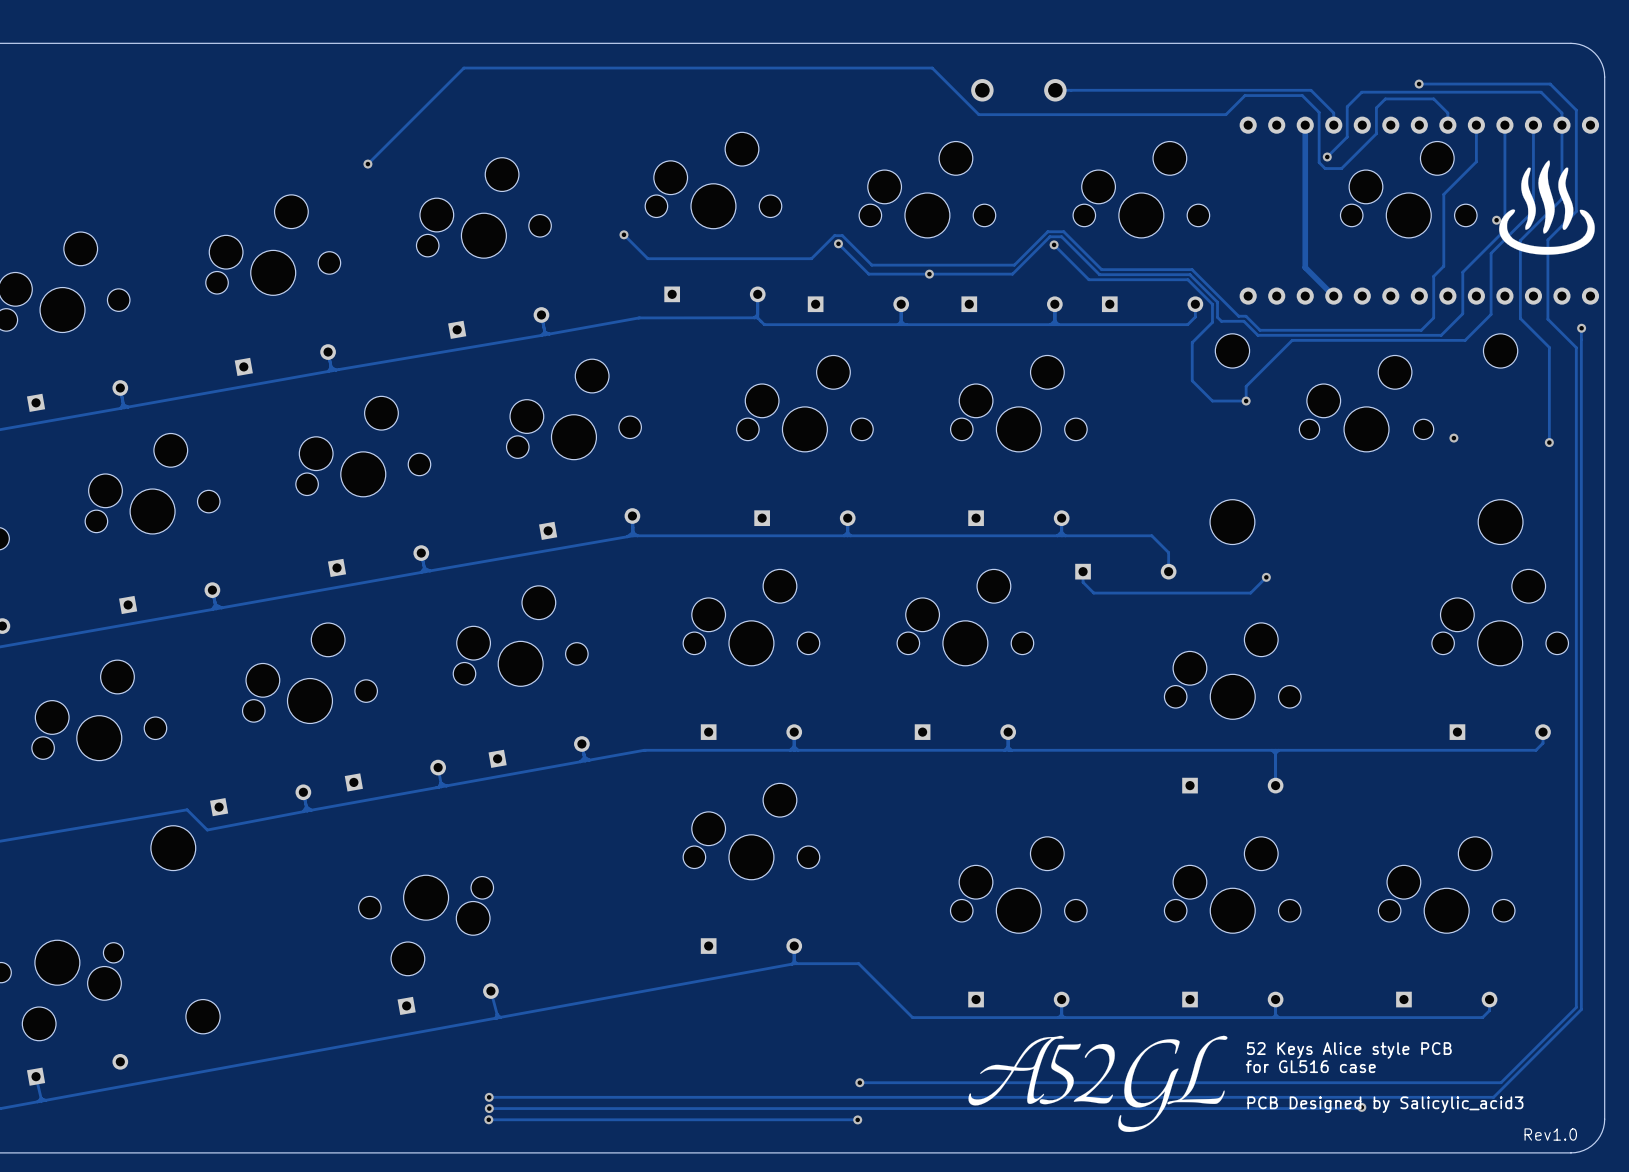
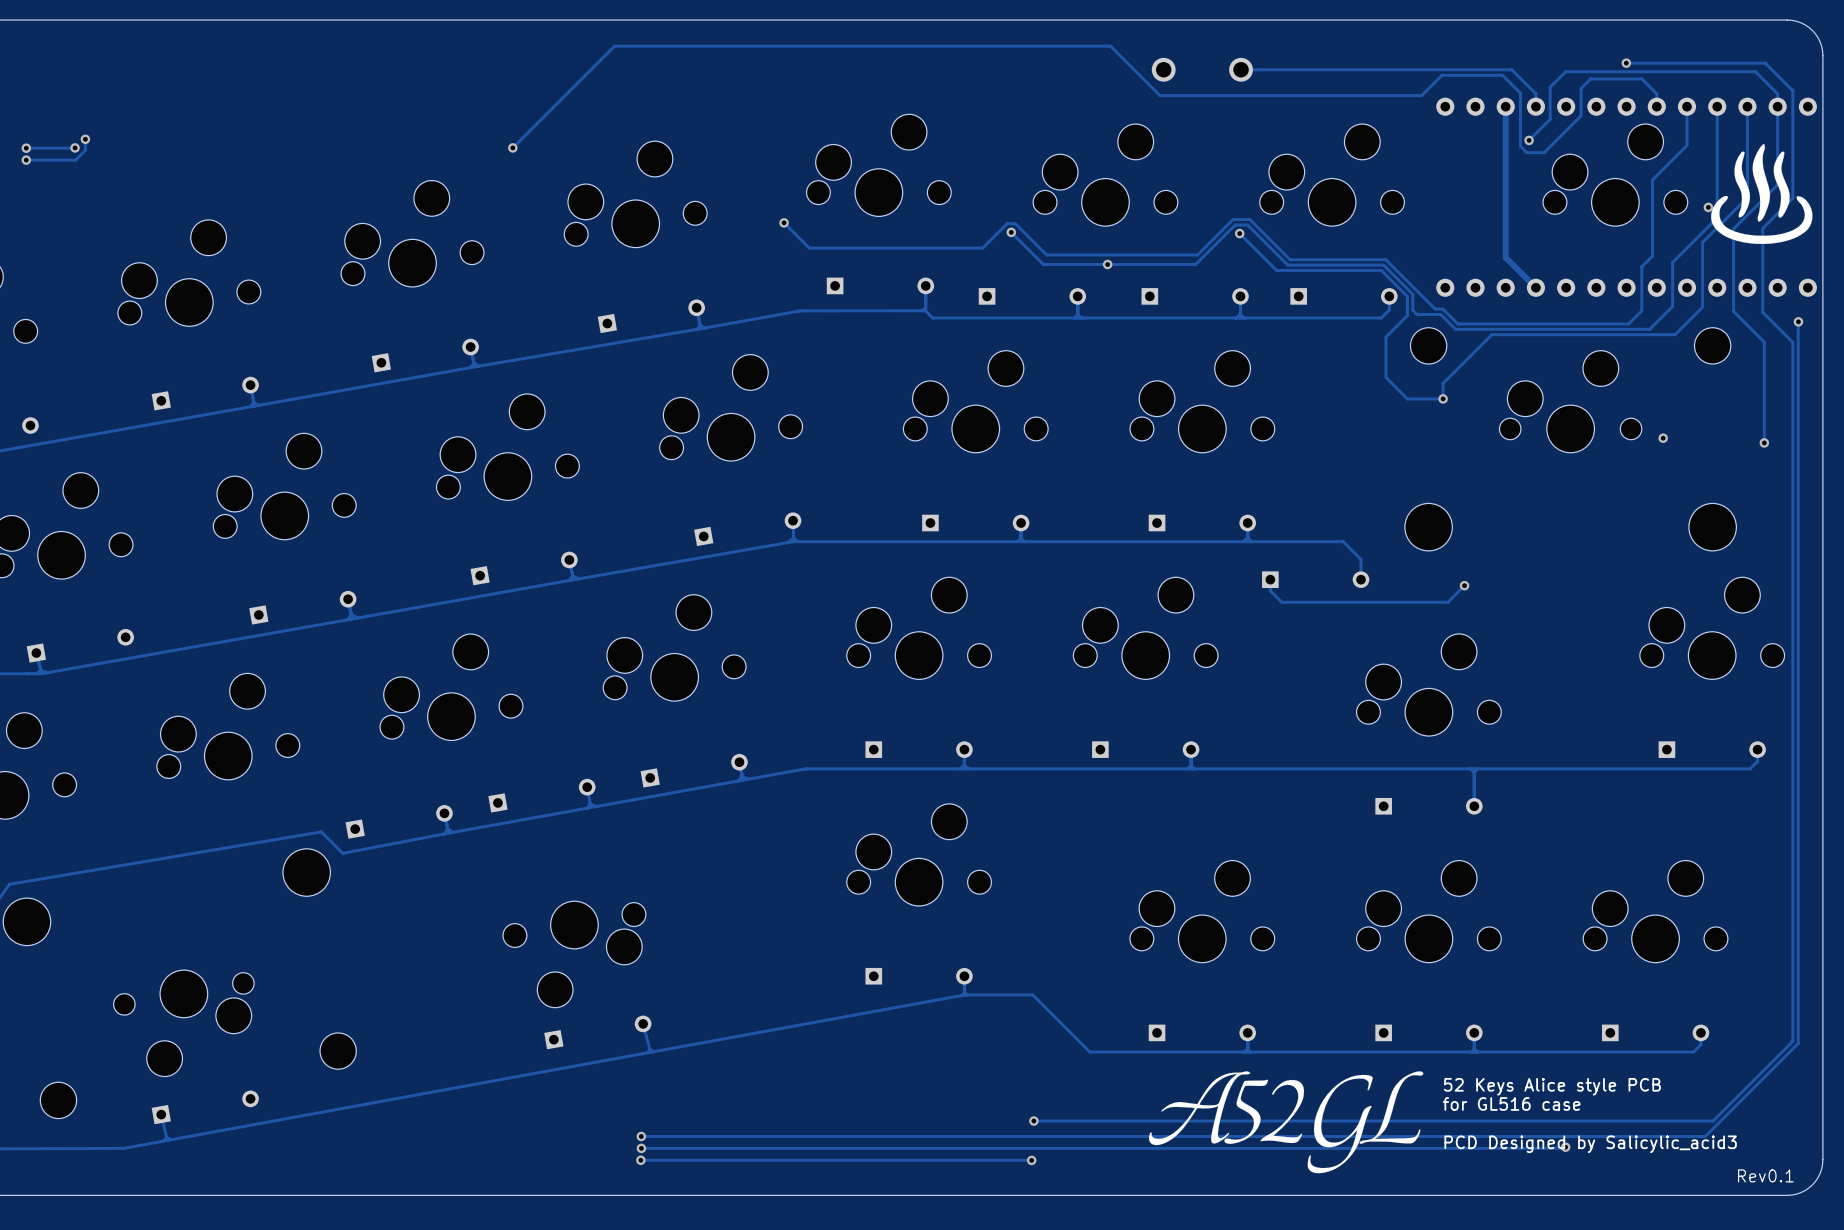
text: PCB Designed by Salicylic_acid3 (1385, 1104) -> PCD Designed by Salicylic_acid3 (1590, 1144)
text: Rev1.0 (1550, 1134) -> Rev0.1 (1765, 1175)

